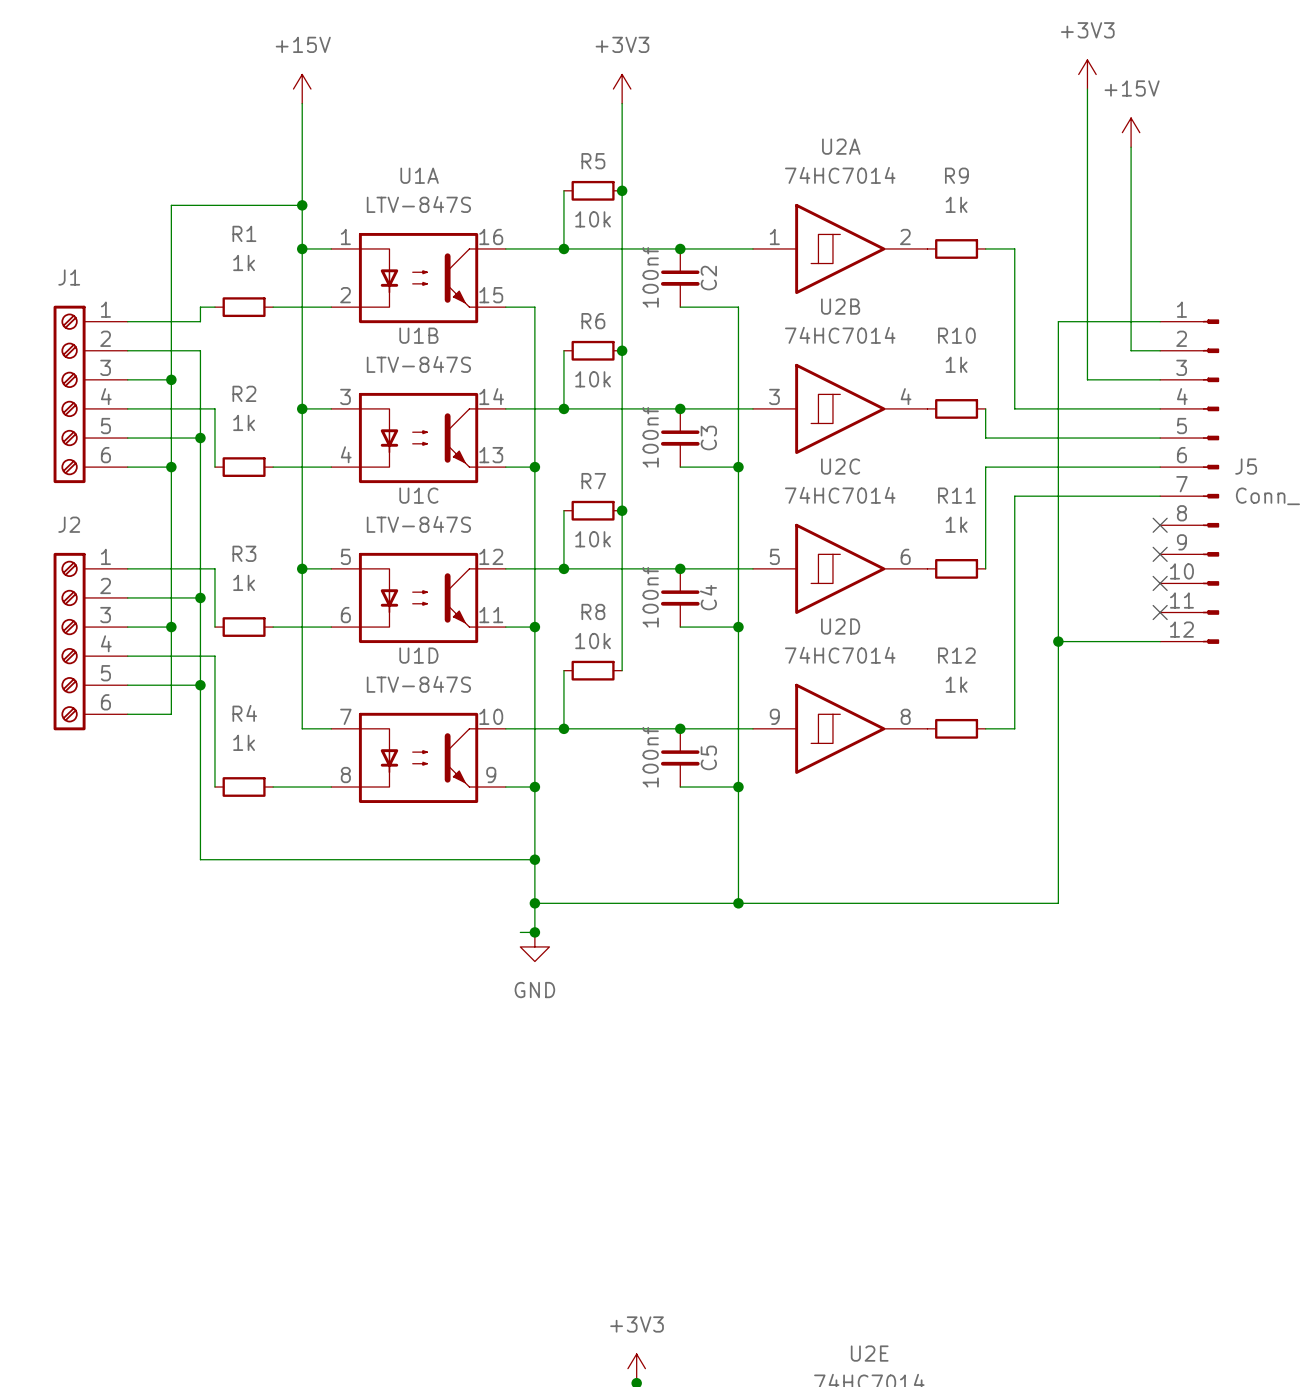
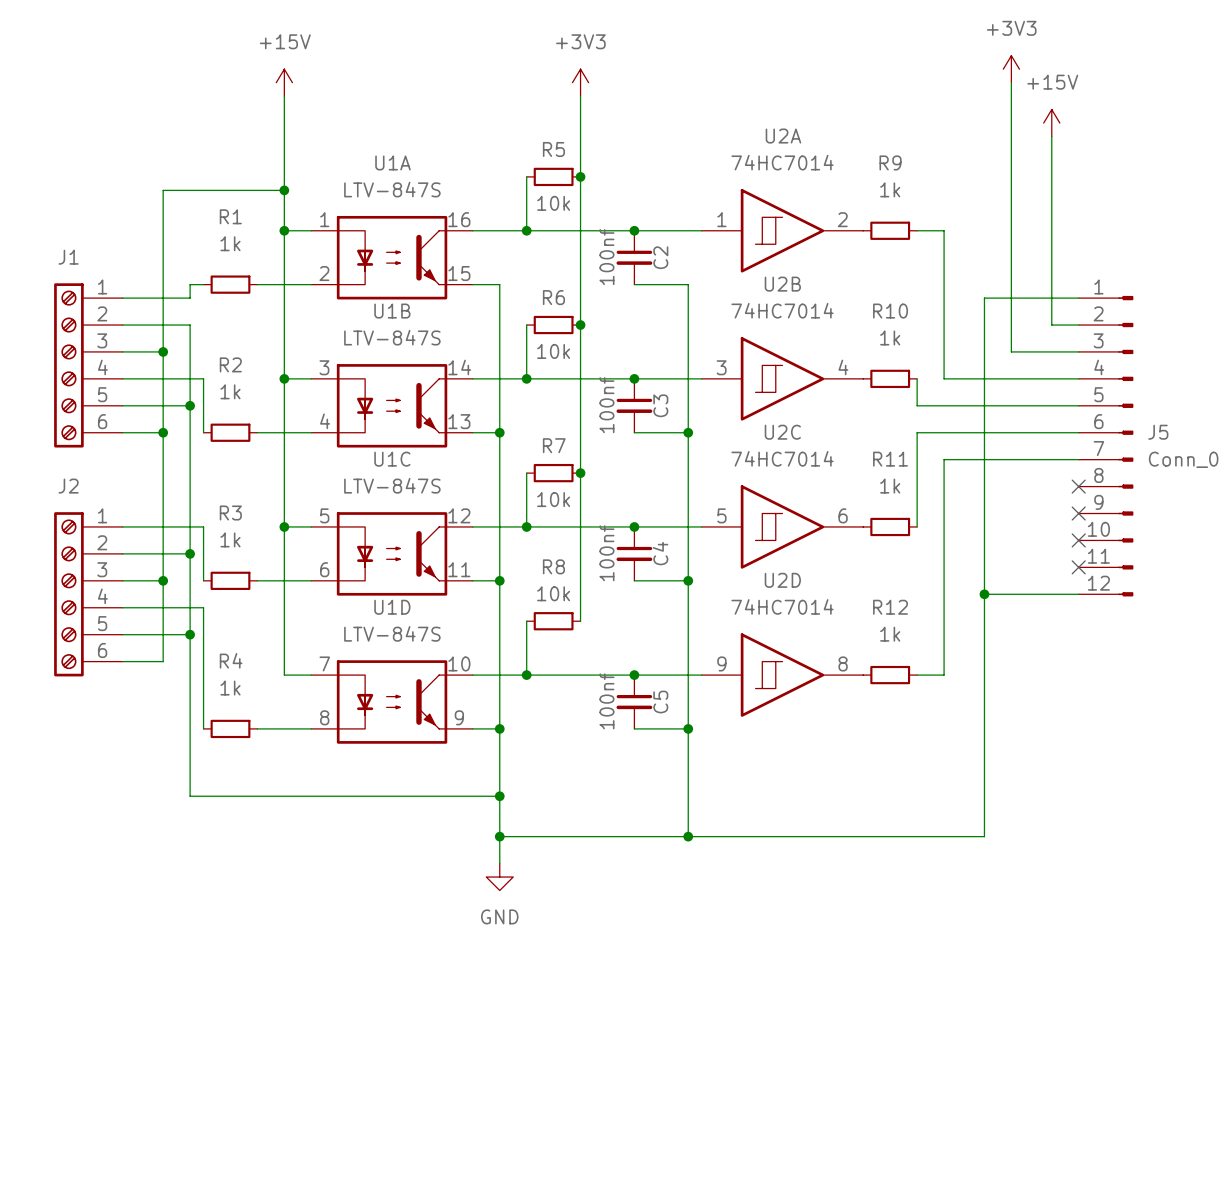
wire: (520, 932) (534, 932) -> none
junction: (534, 932) -> none

